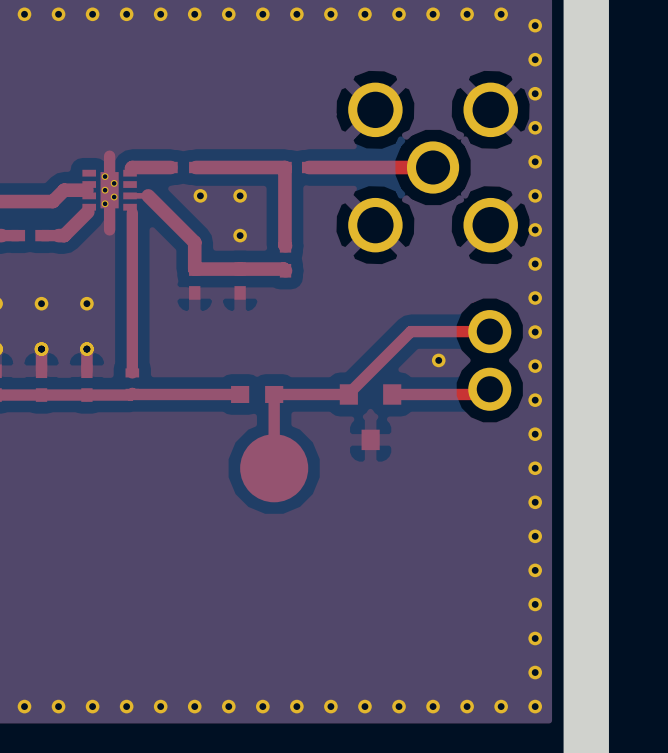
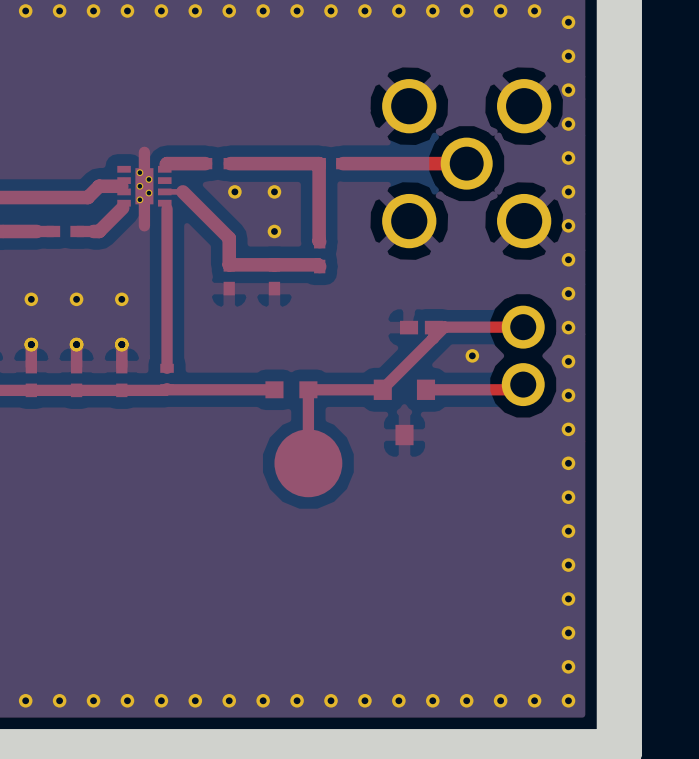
part: none -> (421, 327)

